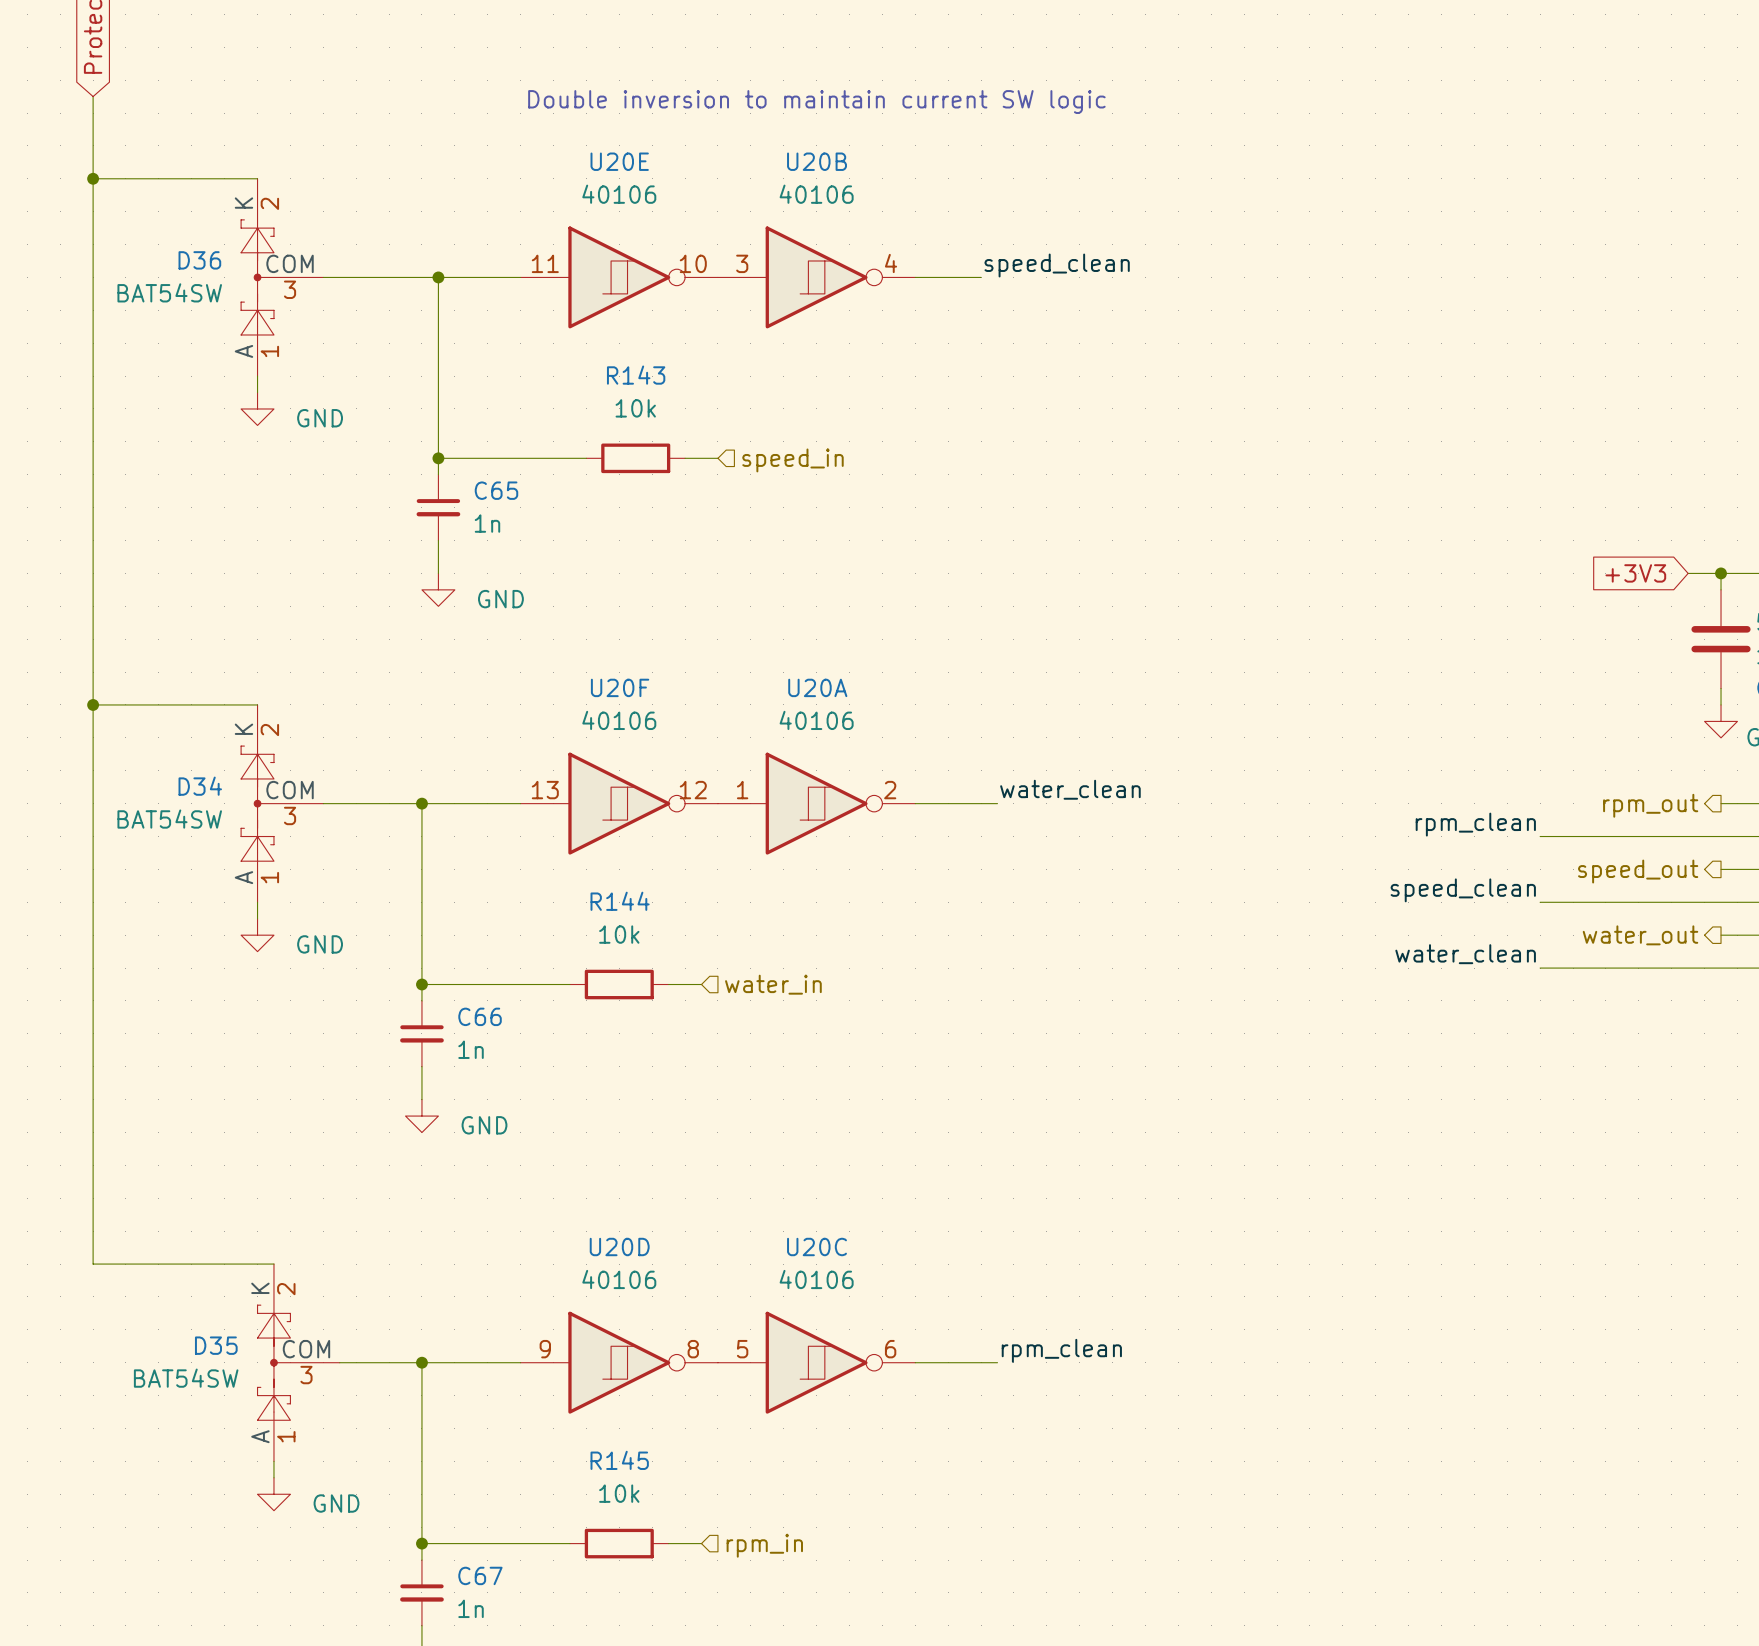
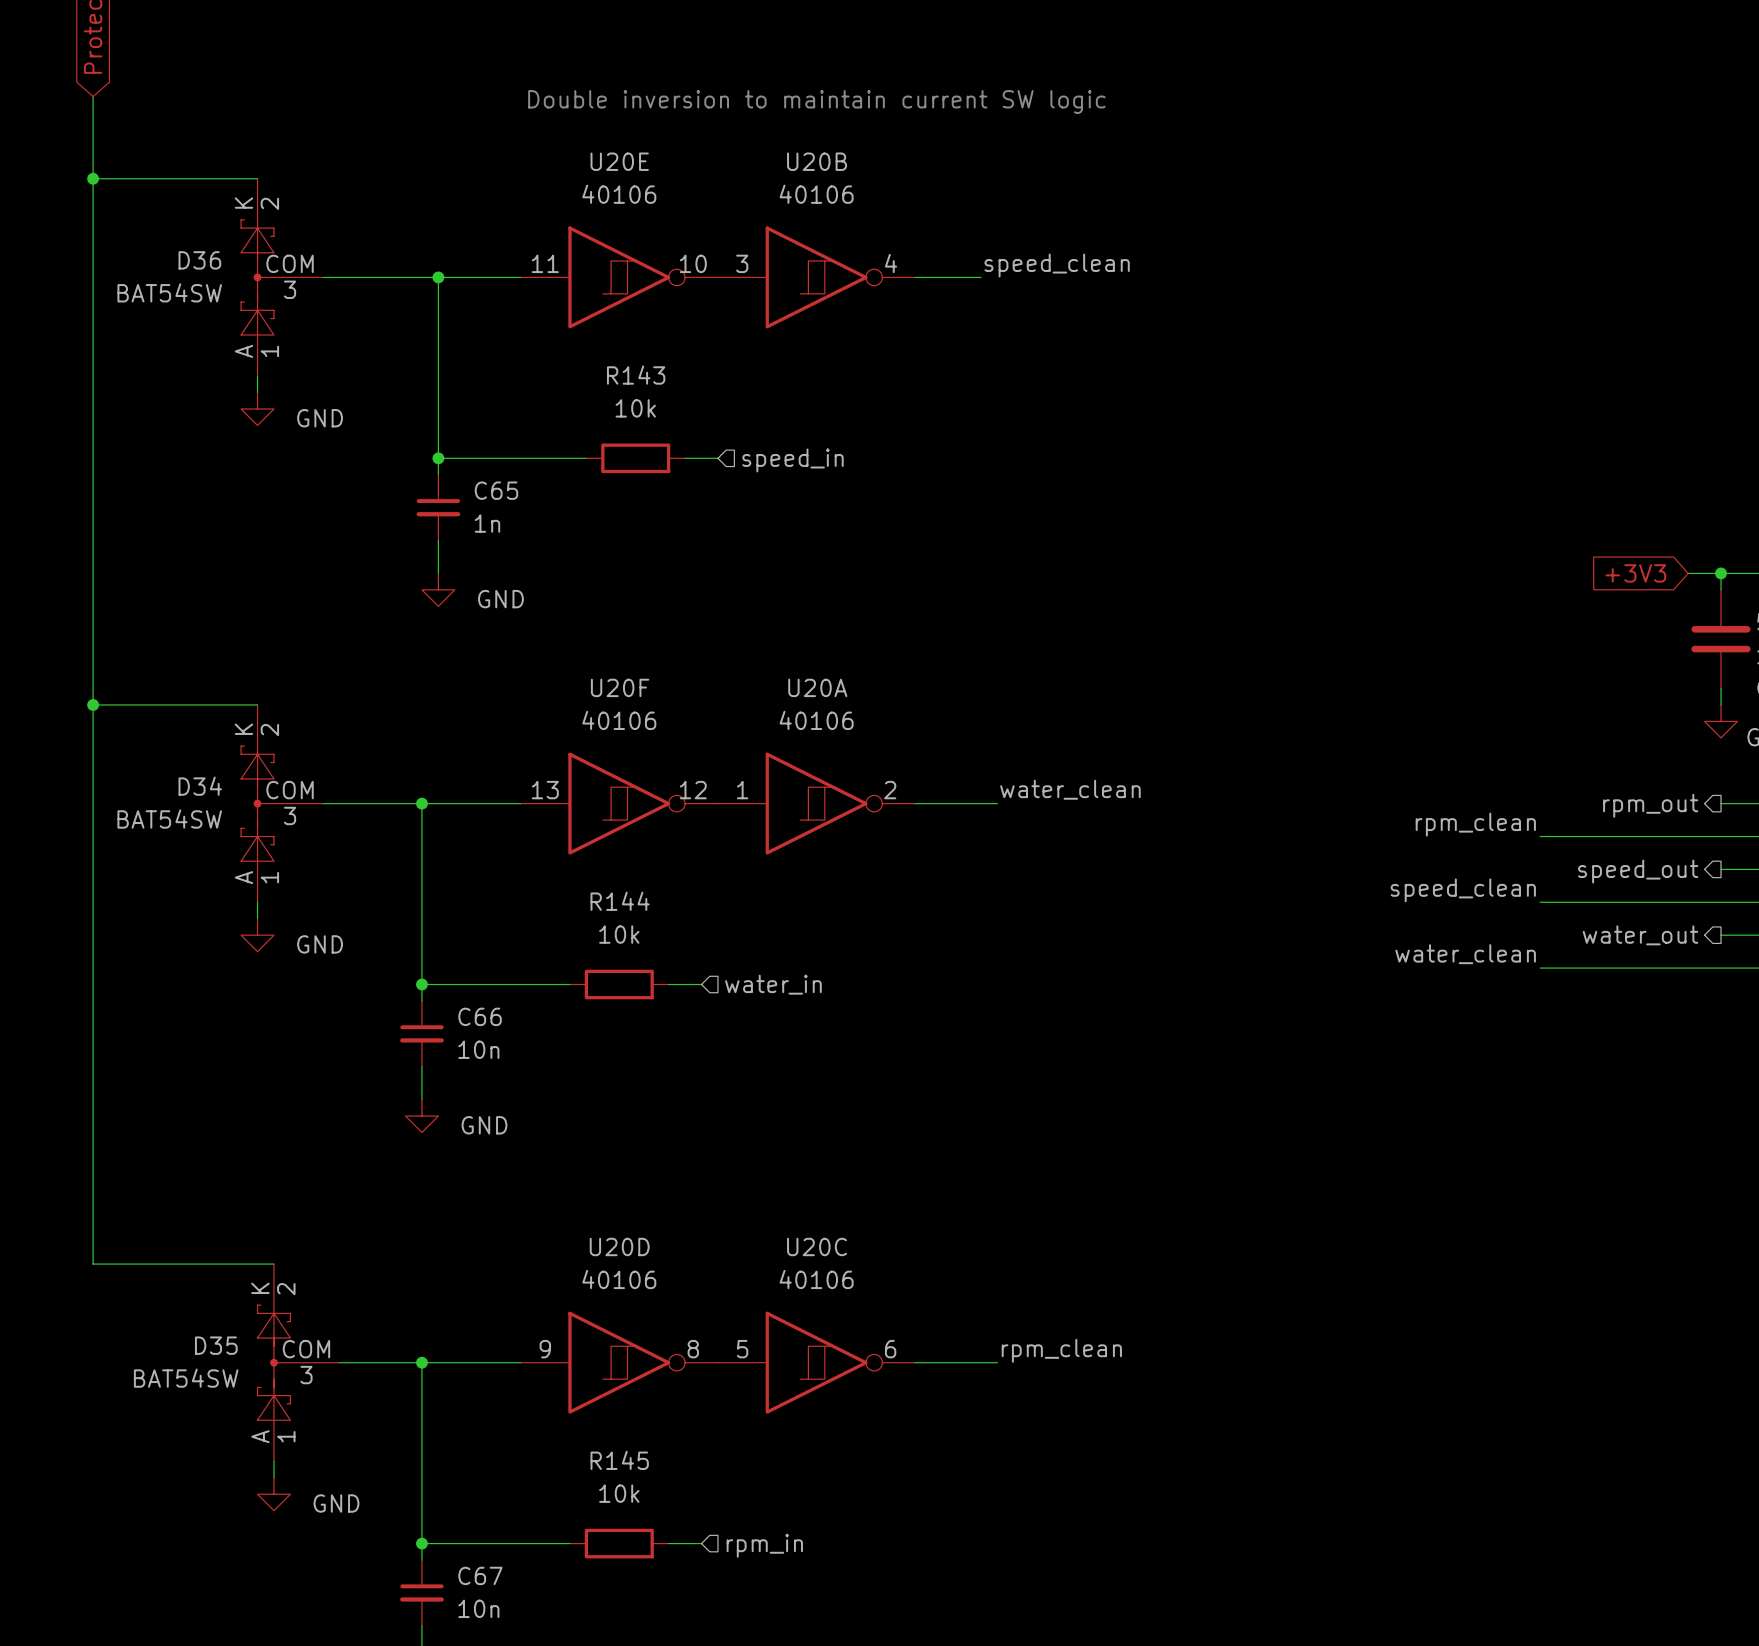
C66 value: 1n (471, 1049) -> 10n (478, 1049)
C67 value: 1n (471, 1608) -> 10n (478, 1608)

